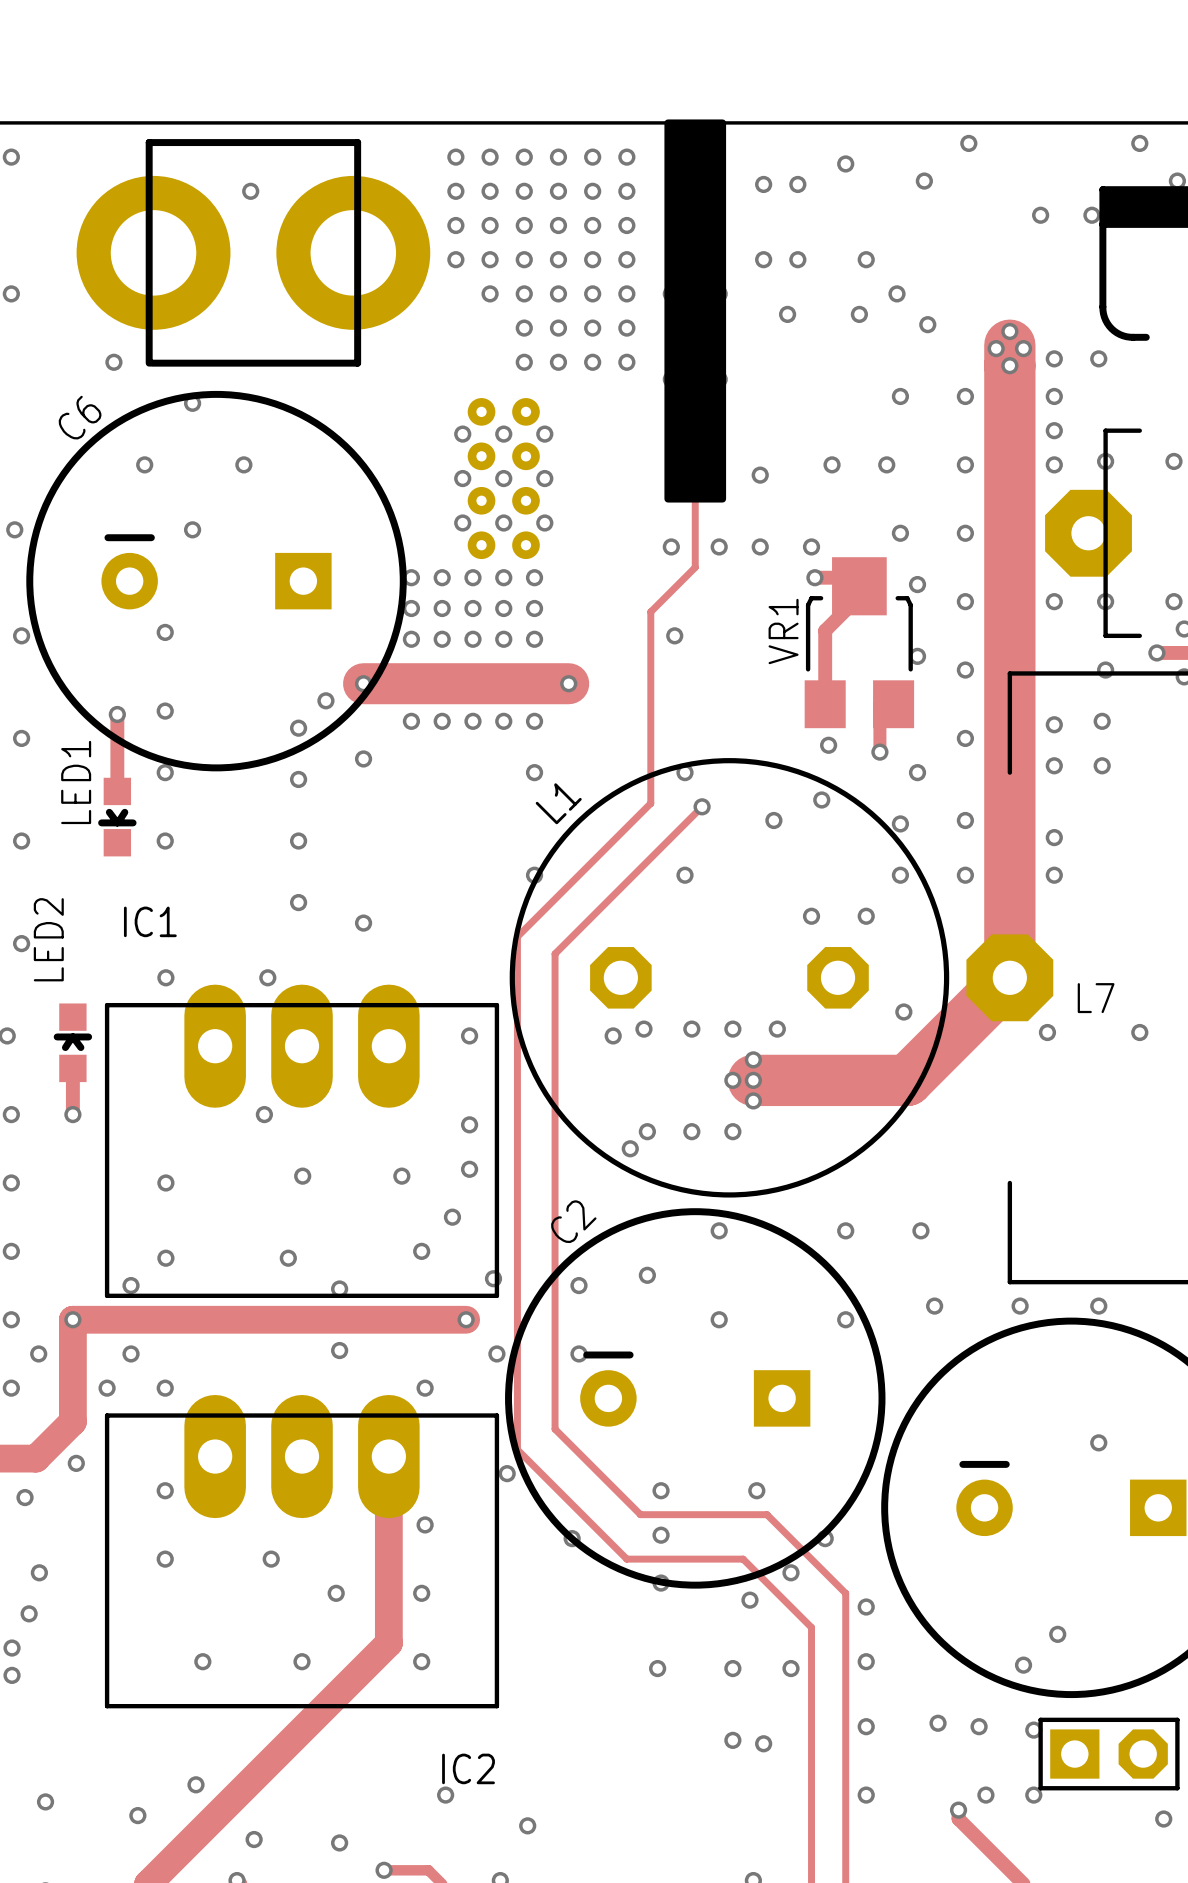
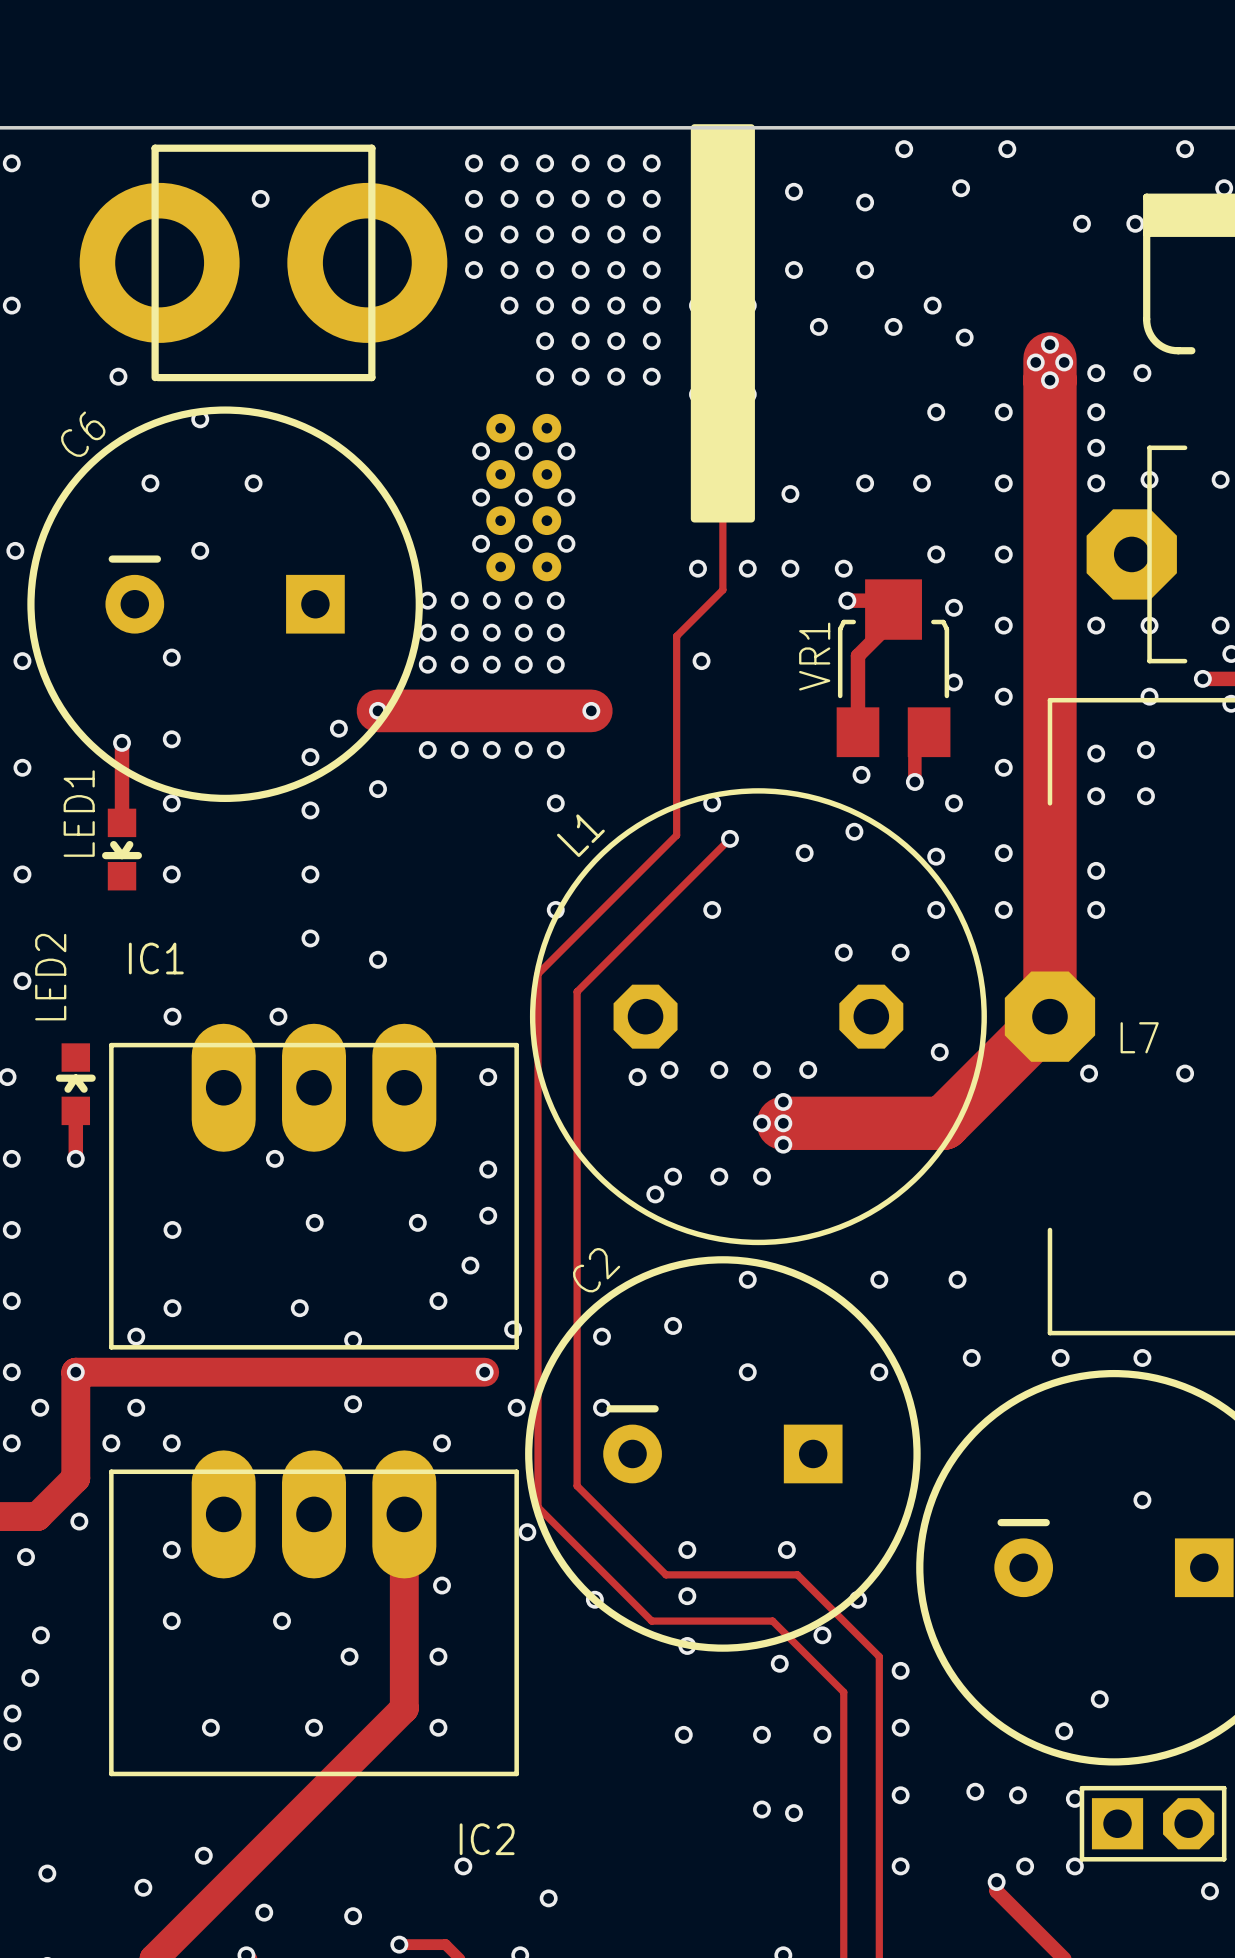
via: none -> (904, 149)
via: (845, 163) -> none
via: (797, 184) -> none
via: none -> (865, 202)
via: (797, 259) -> none
via: none -> (865, 270)
via: (866, 259) -> none

